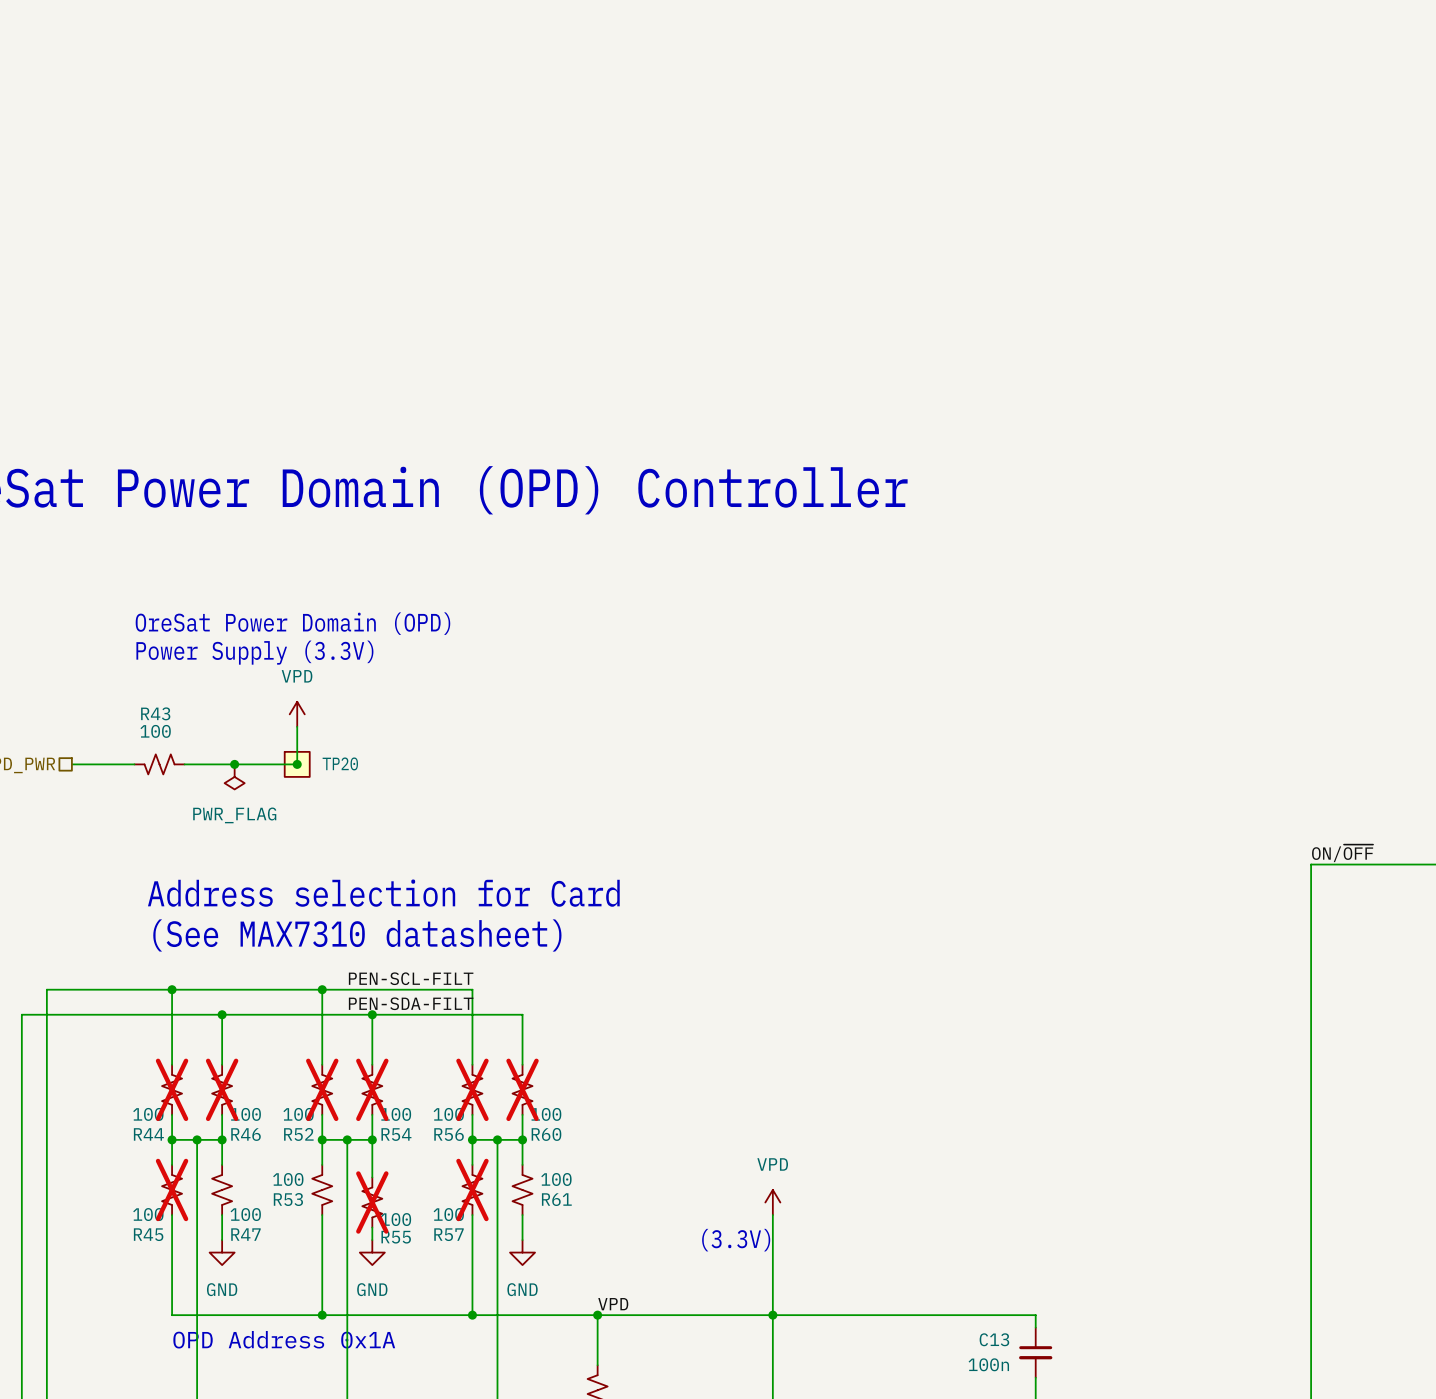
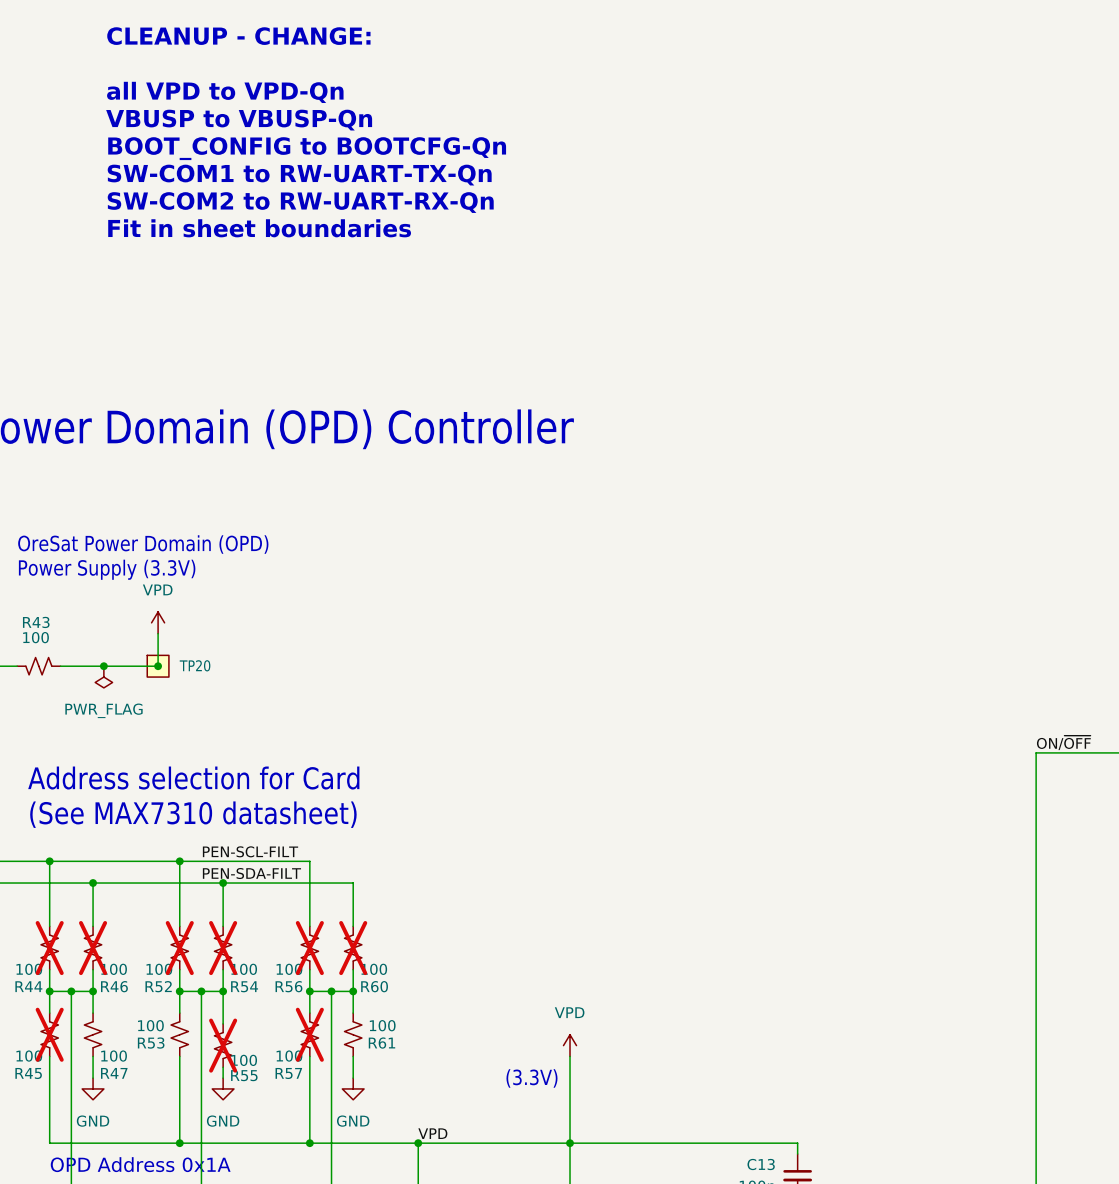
text: none -> CLEANUP - CHANGE: (238, 36)
text: none -> all VPD to VPD-Qn (225, 92)
text: none -> VBUSP to VBUSP-Qn (239, 120)
text: none -> BOOT_CONFIG to BOOTCFG-Qn (307, 148)
text: none -> SW-COM1 to RW-UART-TX-Qn (299, 175)
text: none -> SW-COM2 to RW-UART-RX-Qn (300, 202)
text: none -> Fit in sheet boundaries (259, 228)

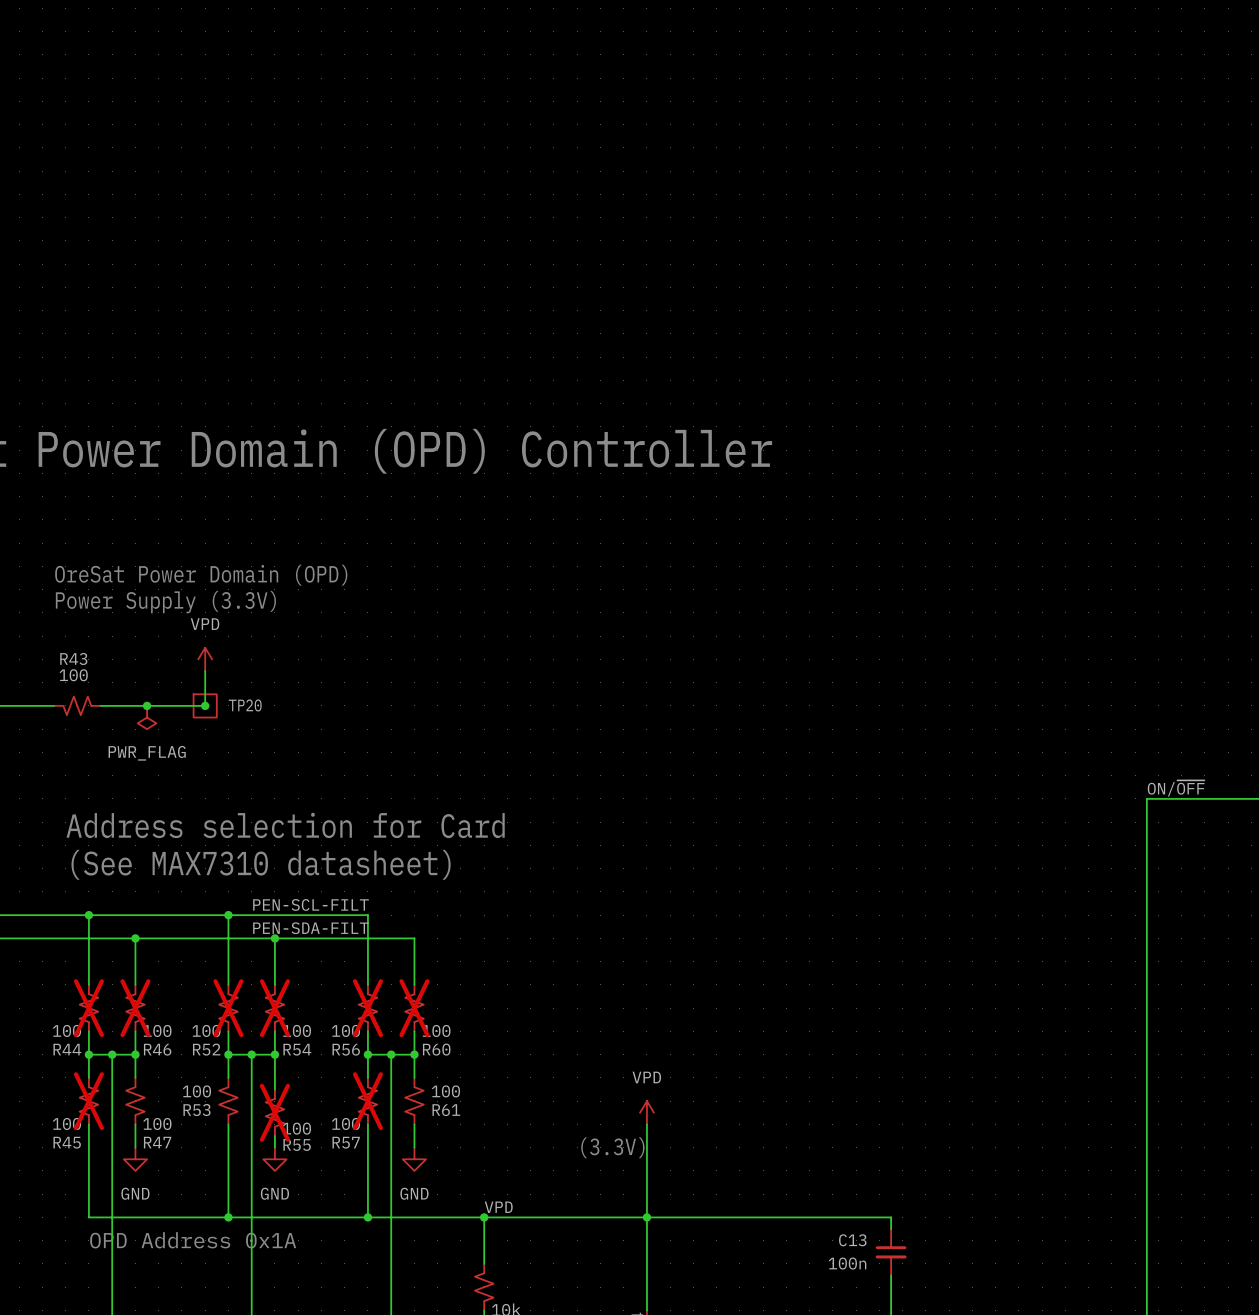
text: CLEANUP - CHANGE: (238, 36) -> none
text: all VPD to VPD-Qn (225, 92) -> none
text: VBUSP to VBUSP-Qn (239, 120) -> none
text: BOOT_CONFIG to BOOTCFG-Qn (307, 148) -> none
text: SW-COM1 to RW-UART-TX-Qn (299, 175) -> none
text: SW-COM2 to RW-UART-RX-Qn (300, 202) -> none
text: Fit in sheet boundaries (259, 228) -> none

